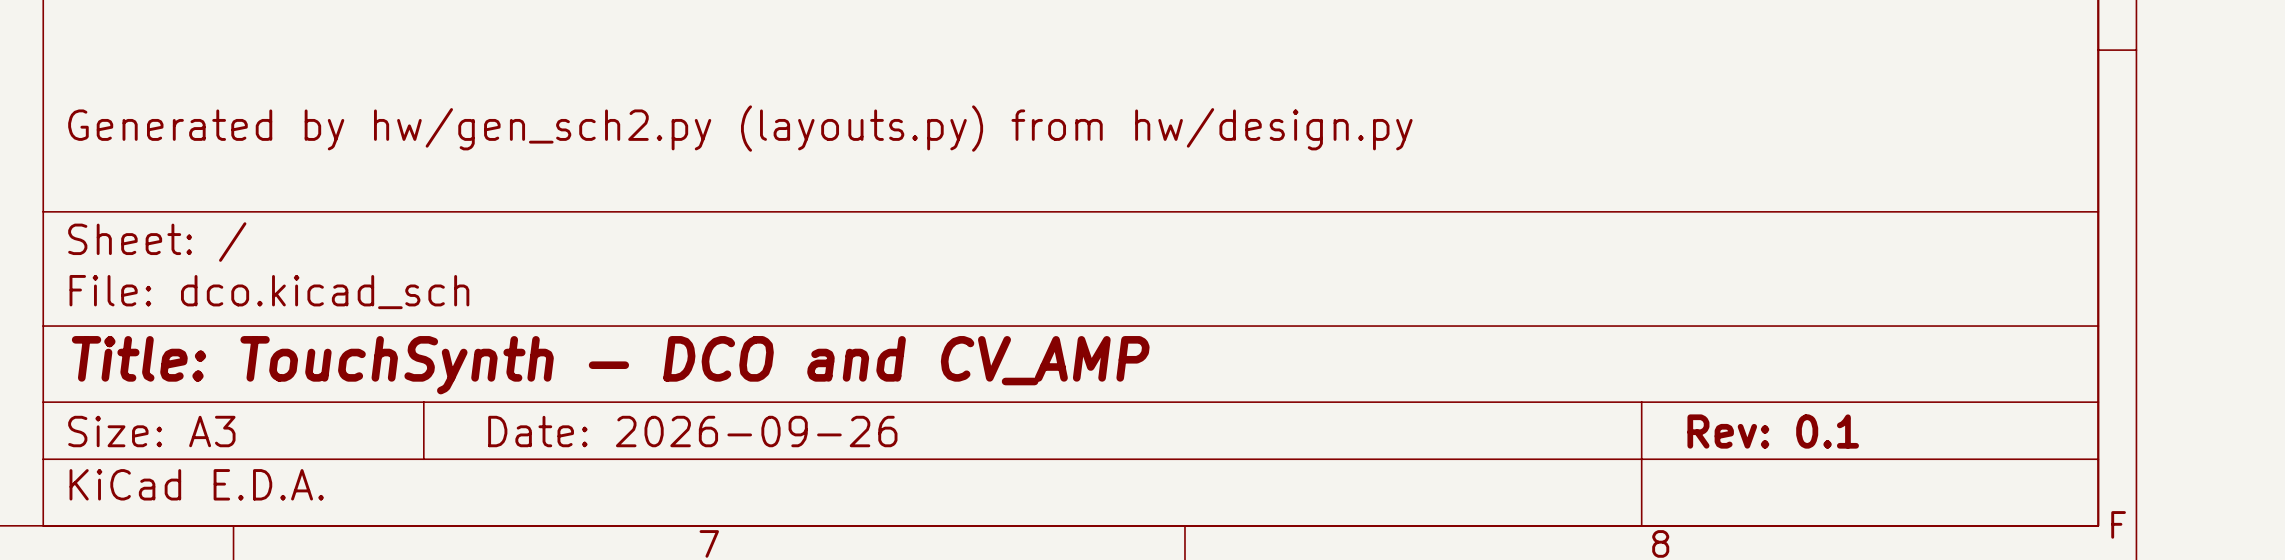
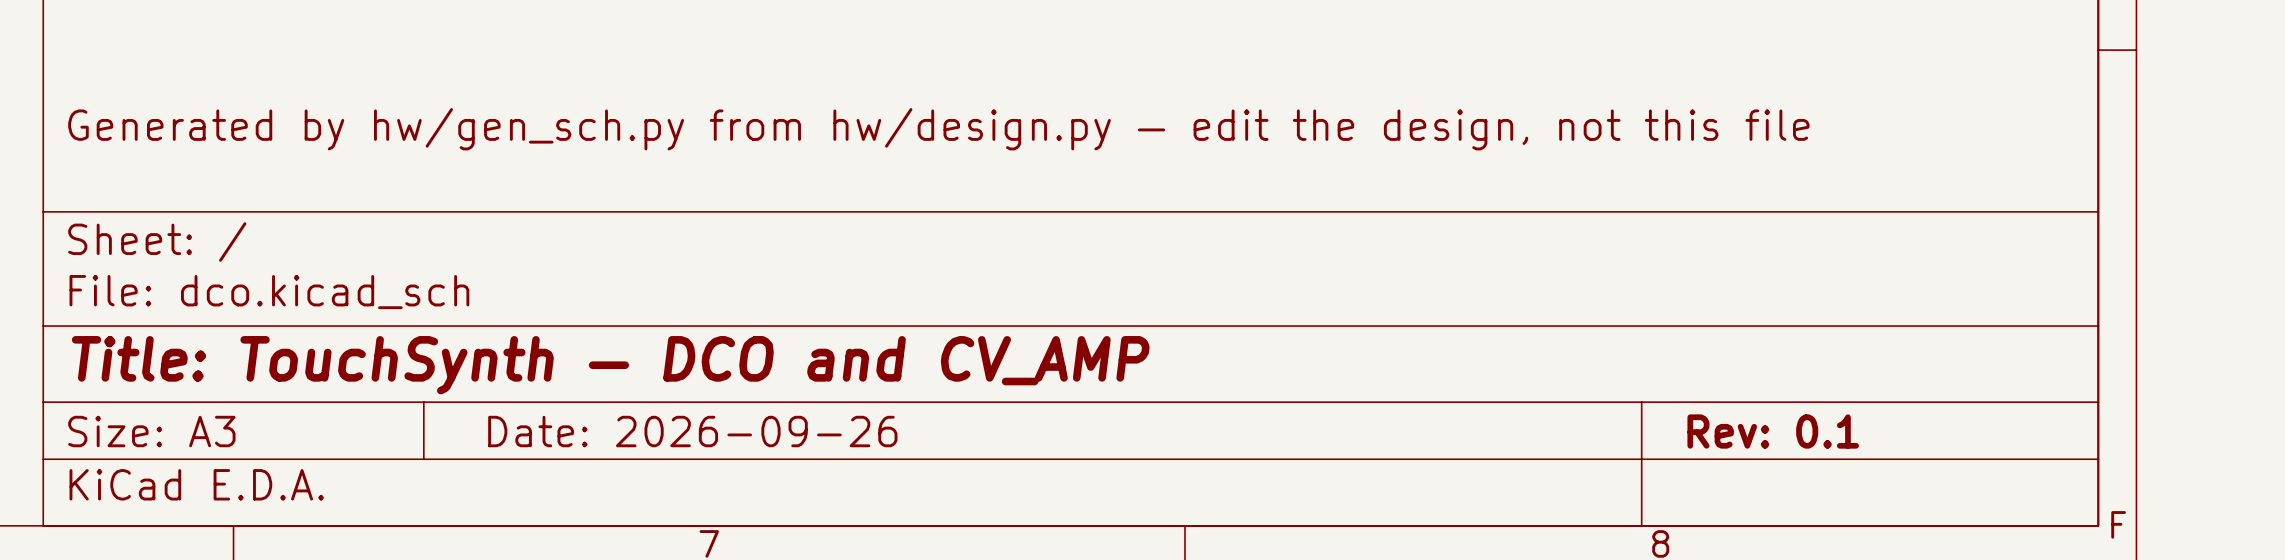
title block: Generated by hw/gen_sch2.py (layouts.py) from hw/design.py (740, 128) -> Generated by hw/gen_sch.py from hw/design.py — edit the design, not this file (938, 129)

